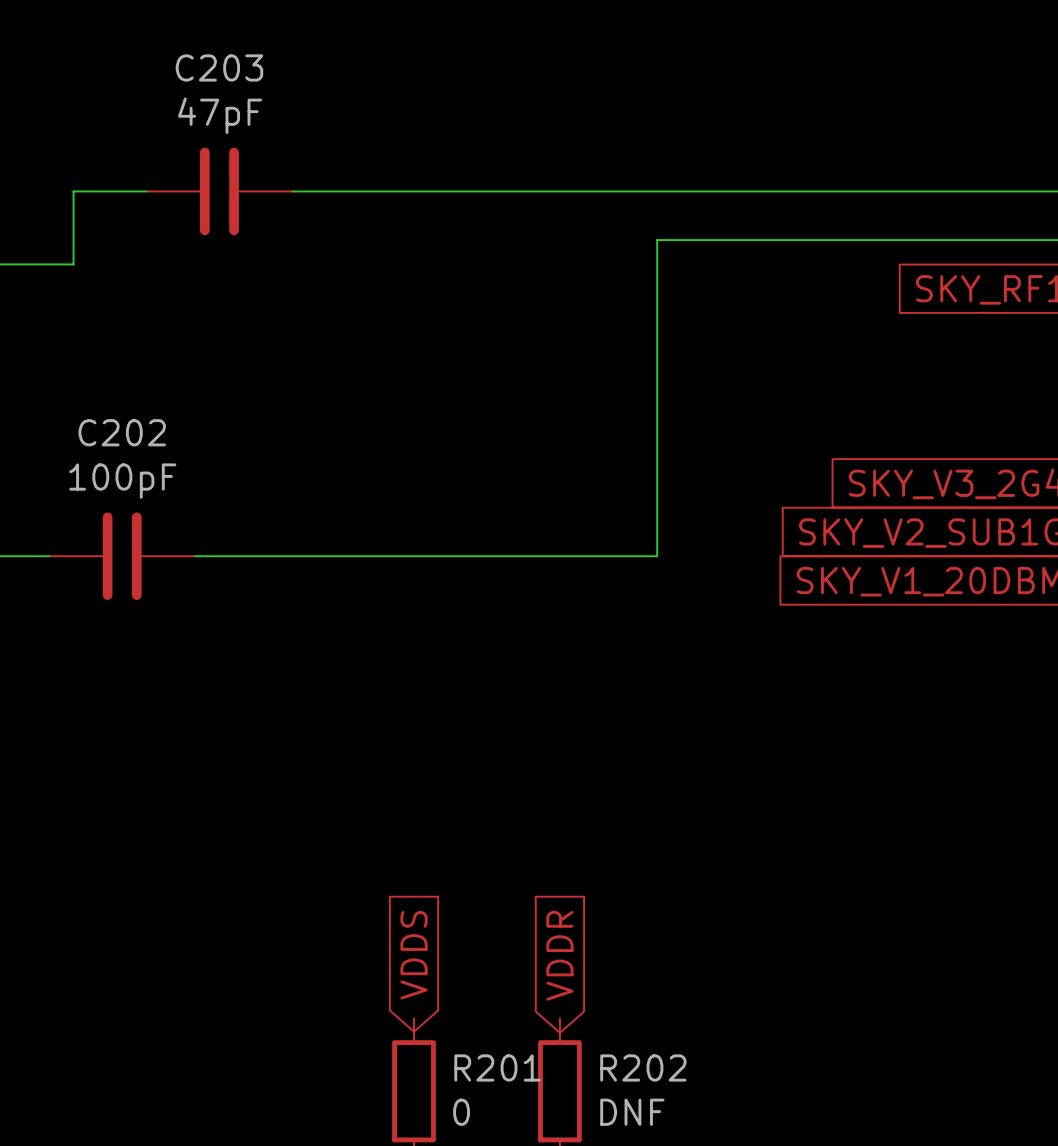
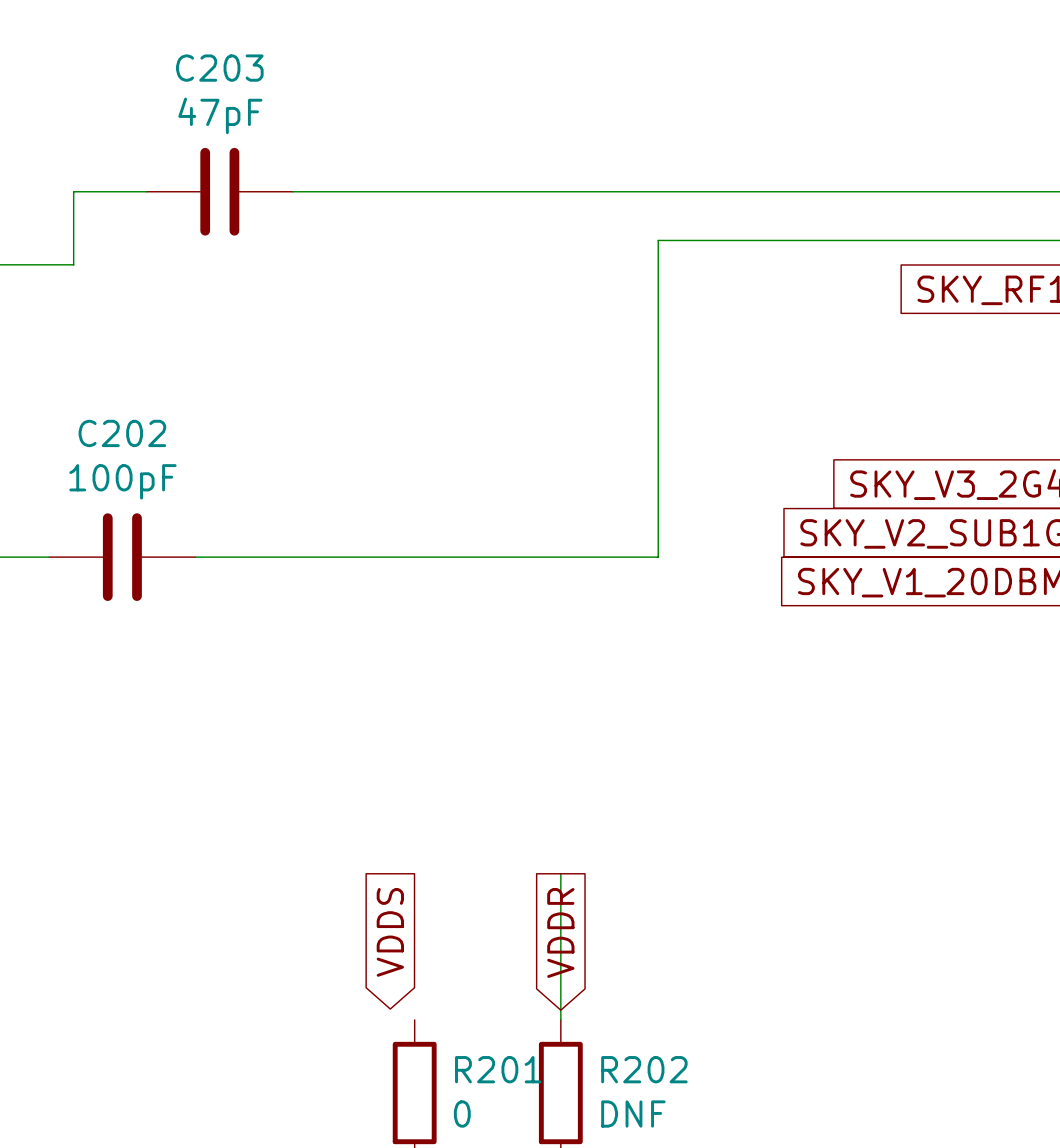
wire: none -> (560, 873) (560, 1019)
global label position: VDDS (414, 955) -> VDDS (390, 932)
global label position: VDDR (559, 955) -> VDDR (560, 932)

